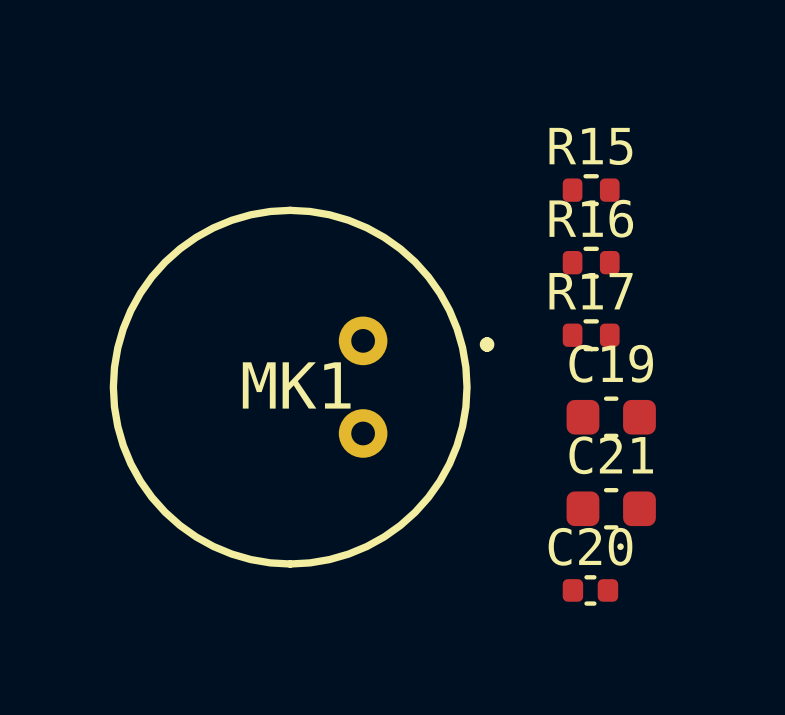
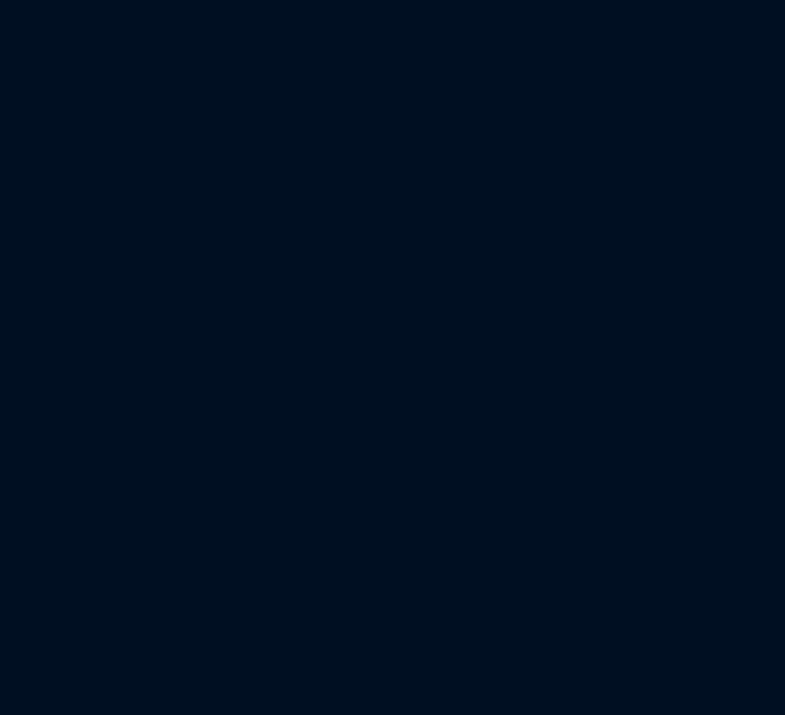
R15: (591, 190) -> none
R16: (591, 262) -> none
R17: (591, 335) -> none
MK1: (302, 387) -> none
C19: (611, 417) -> none
C21: (611, 508) -> none
C20: (590, 590) -> none

